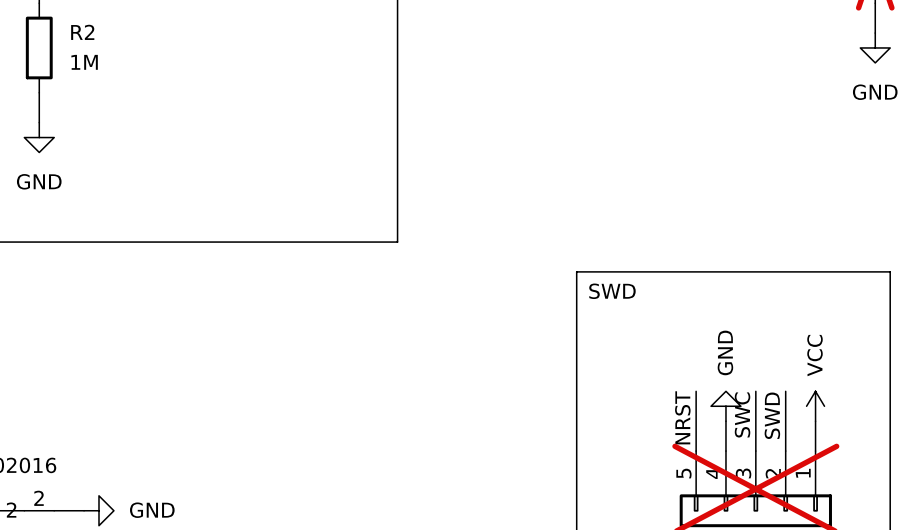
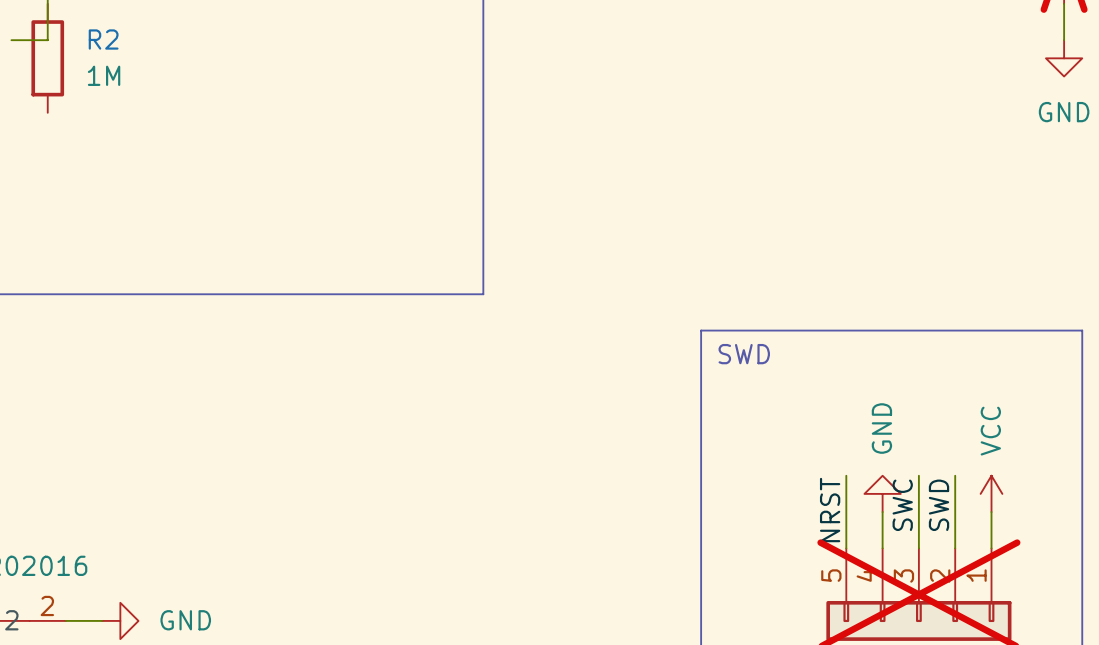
wire: none -> (47, 3) (47, 40) (11, 40)
wire: (39, 92) (39, 122) -> none
power symbol: GND (39, 137) -> none

